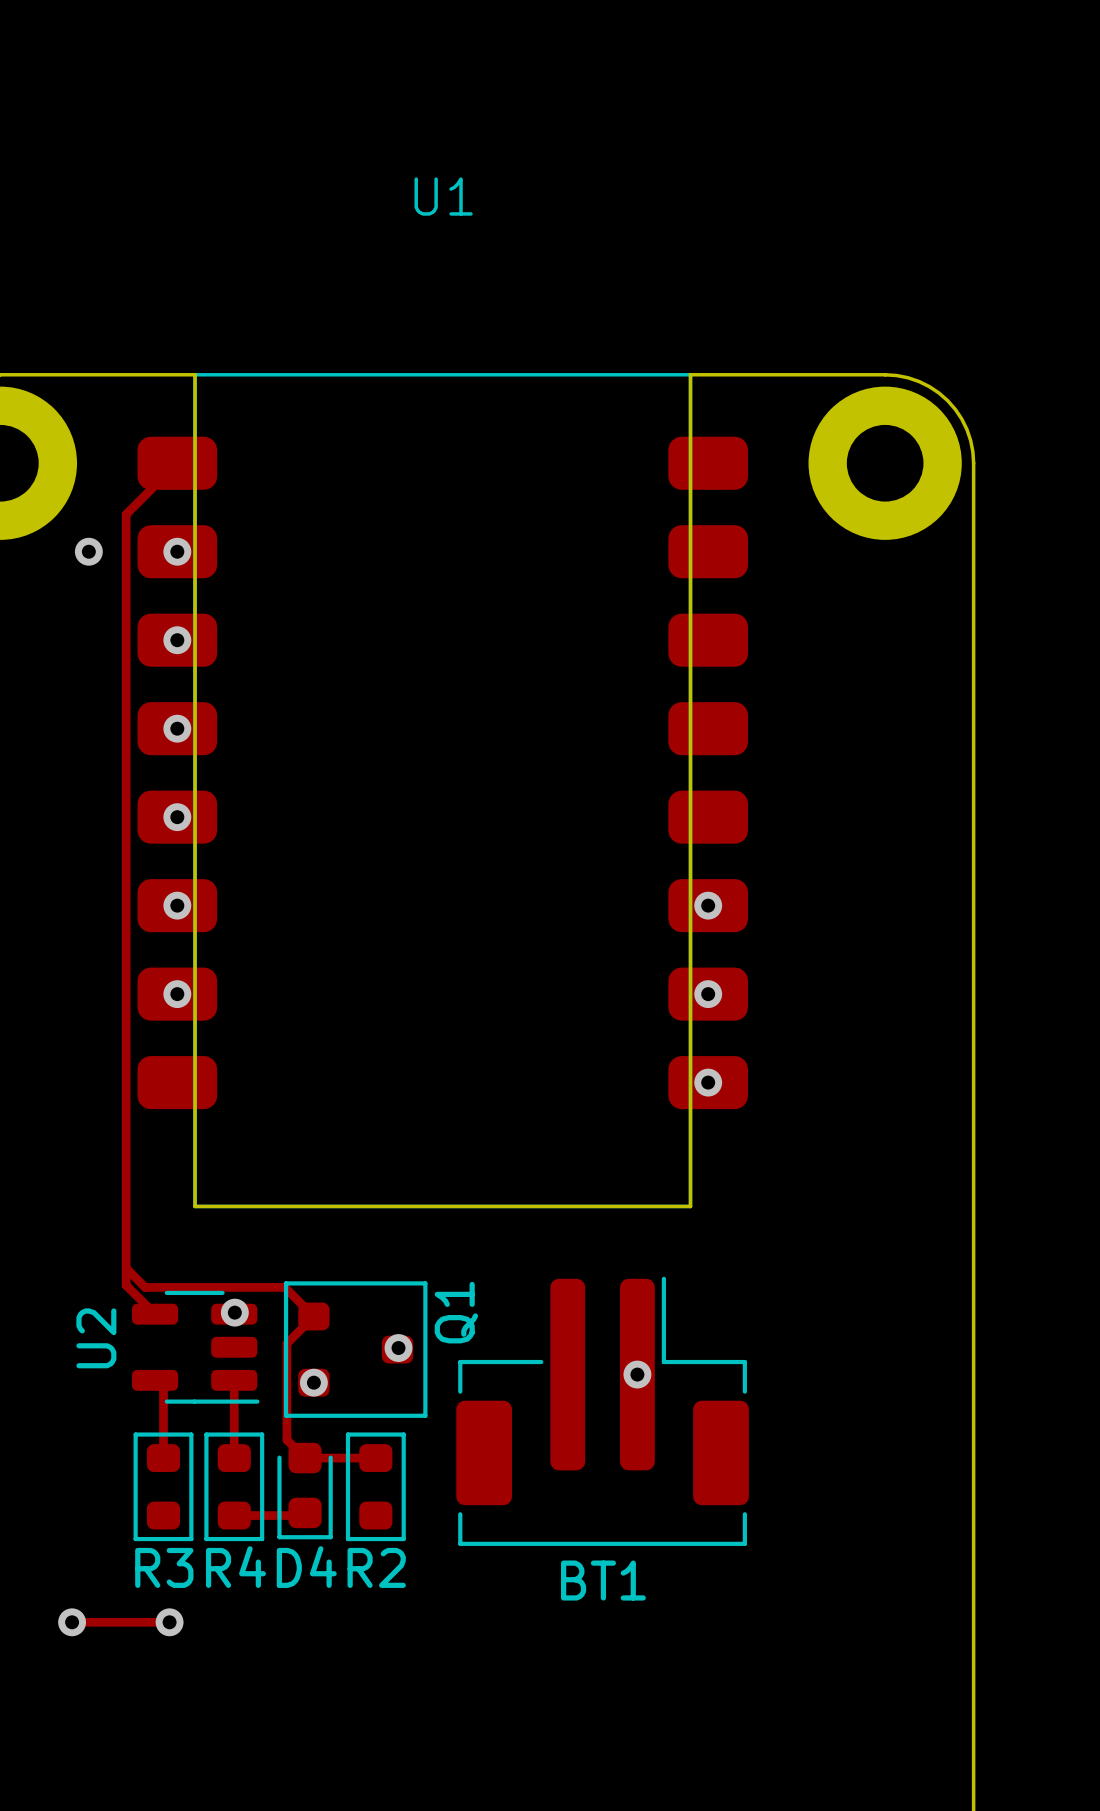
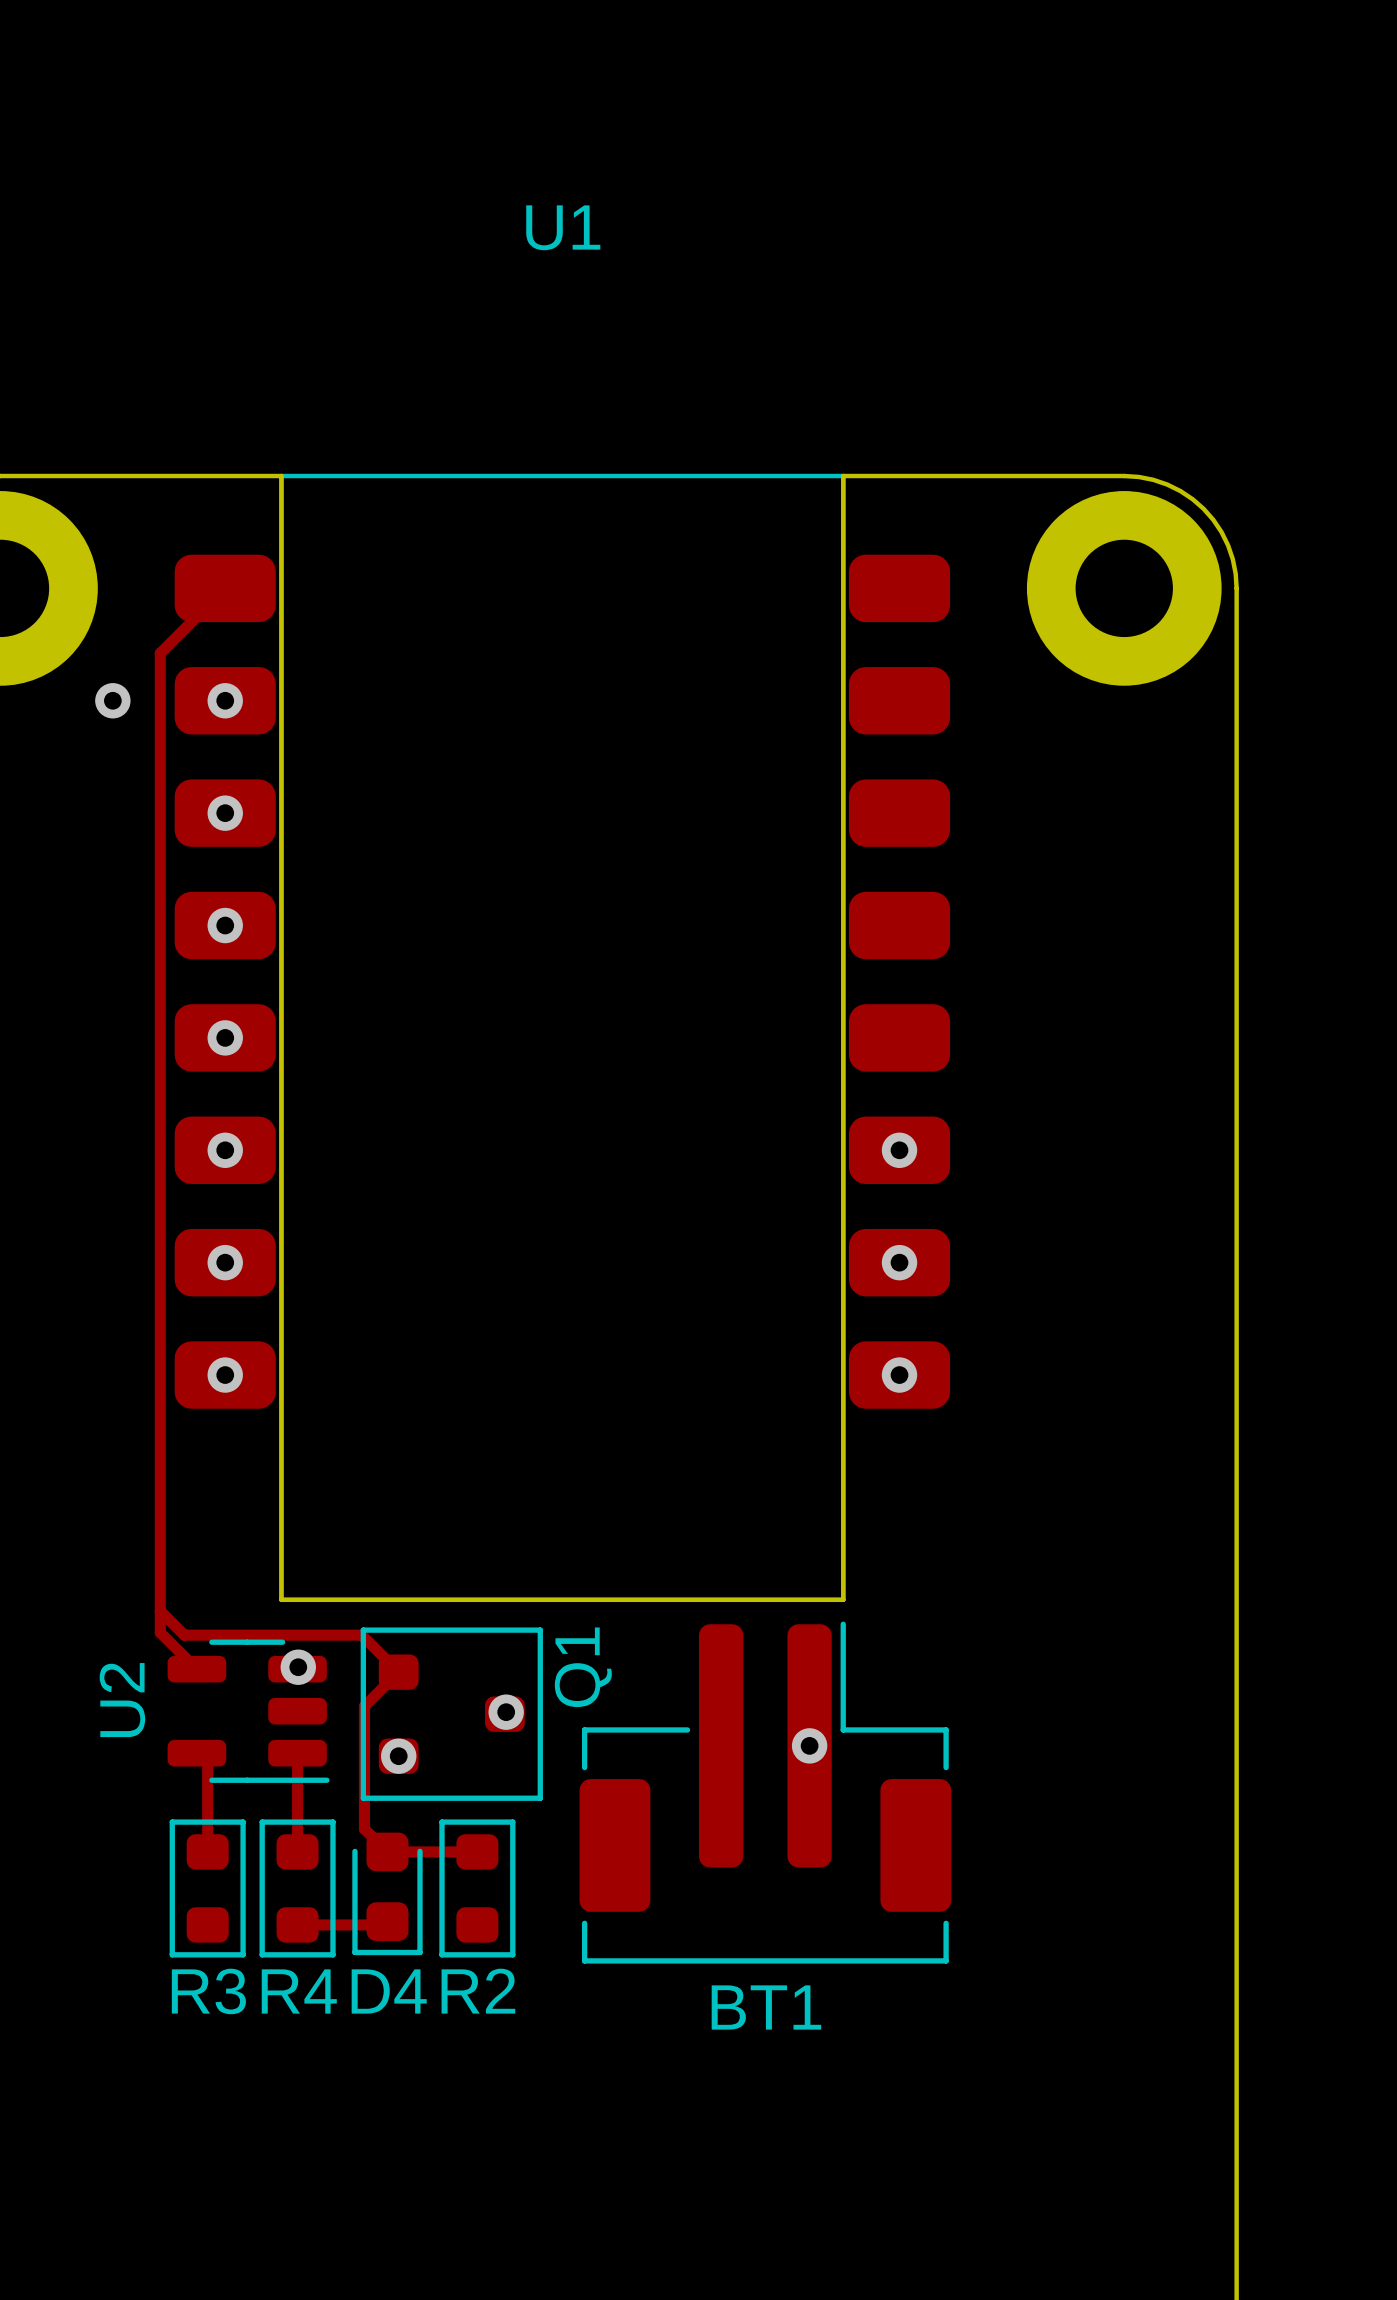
U1 footprint: [137, 373, 749, 1209] -> [174, 473, 951, 1603]
board edge: (195, 374) (195, 1206) (690, 1206) (690, 374) -> (247, 476) (281, 476) (281, 1599) (843, 1599) (843, 476) (877, 476)
via: none -> (225, 1375)
track: (72, 1622) (169, 1622) -> none
via: (72, 1622) -> none
via: (169, 1622) -> none

